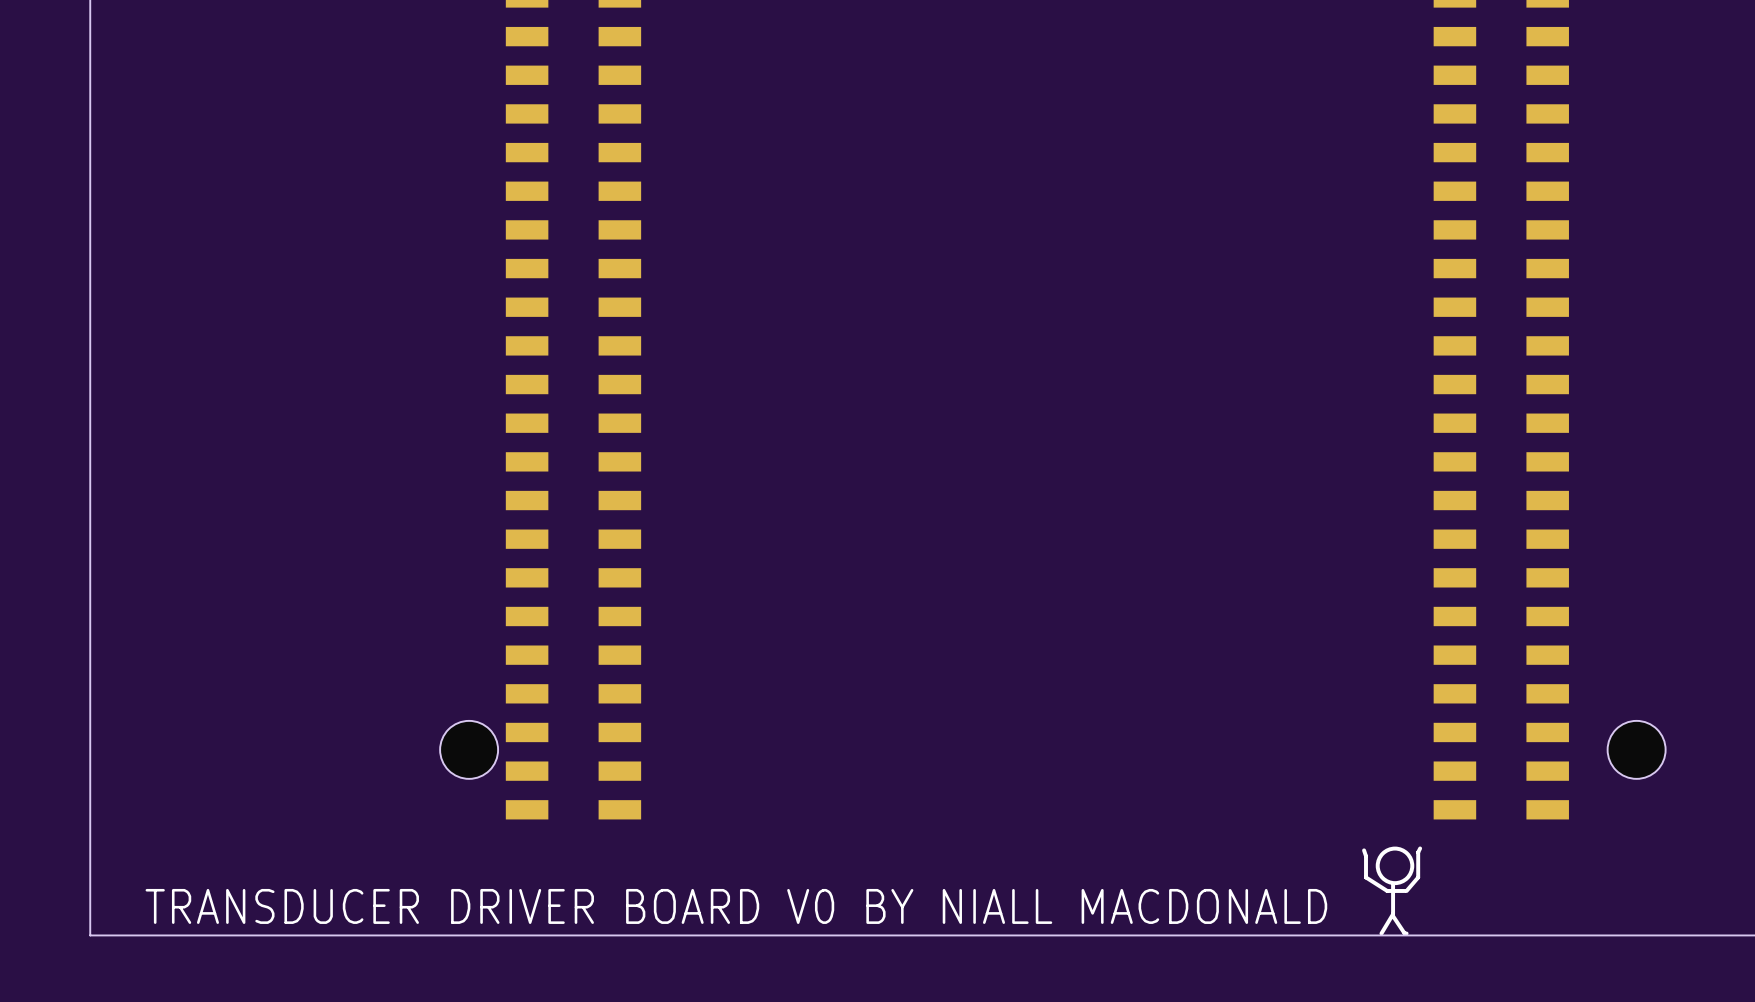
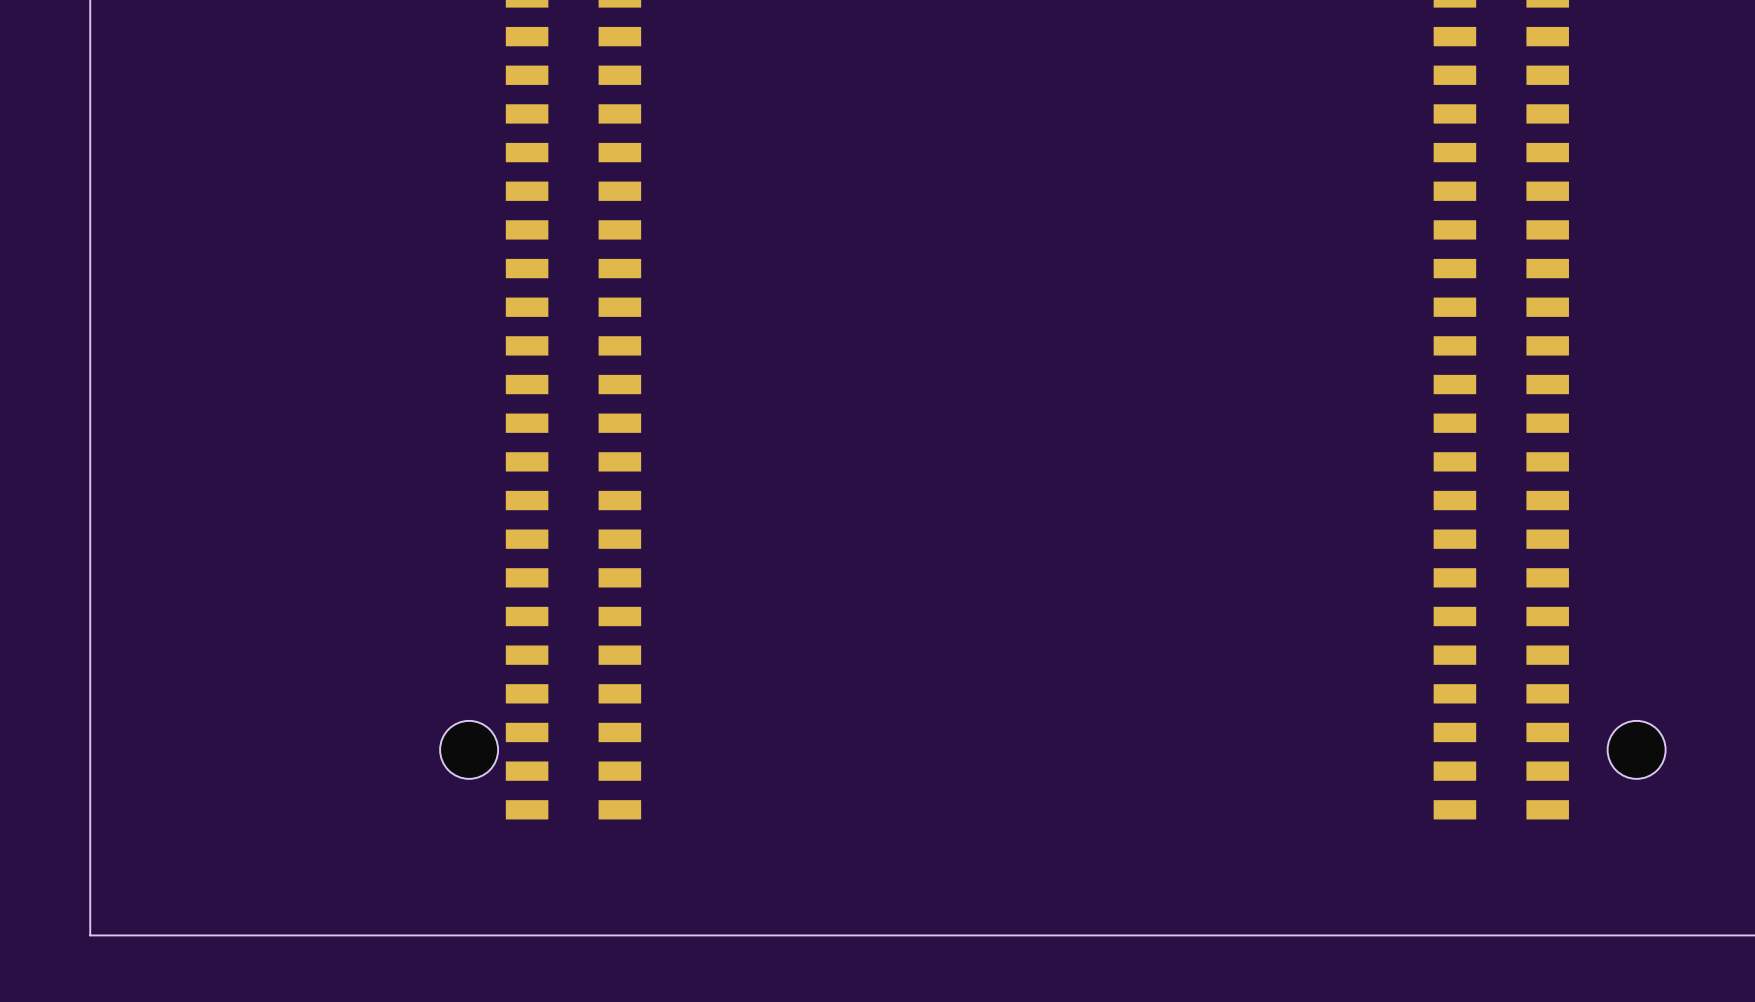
drawing: [1375, 846, 1415, 886] -> none
line: (1420, 848) (1418, 852) (1418, 877) (1406, 890) -> none
line: (1364, 850) (1366, 856) (1366, 877) (1387, 890) (1404, 890) -> none
line: (1393, 885) (1393, 914) (1381, 933) -> none
text: TRANSDUCER DRIVER BOARD V0 BY NIALL MACDONALD (736, 906) -> none
line: (1393, 916) (1404, 933) (1406, 933) -> none

